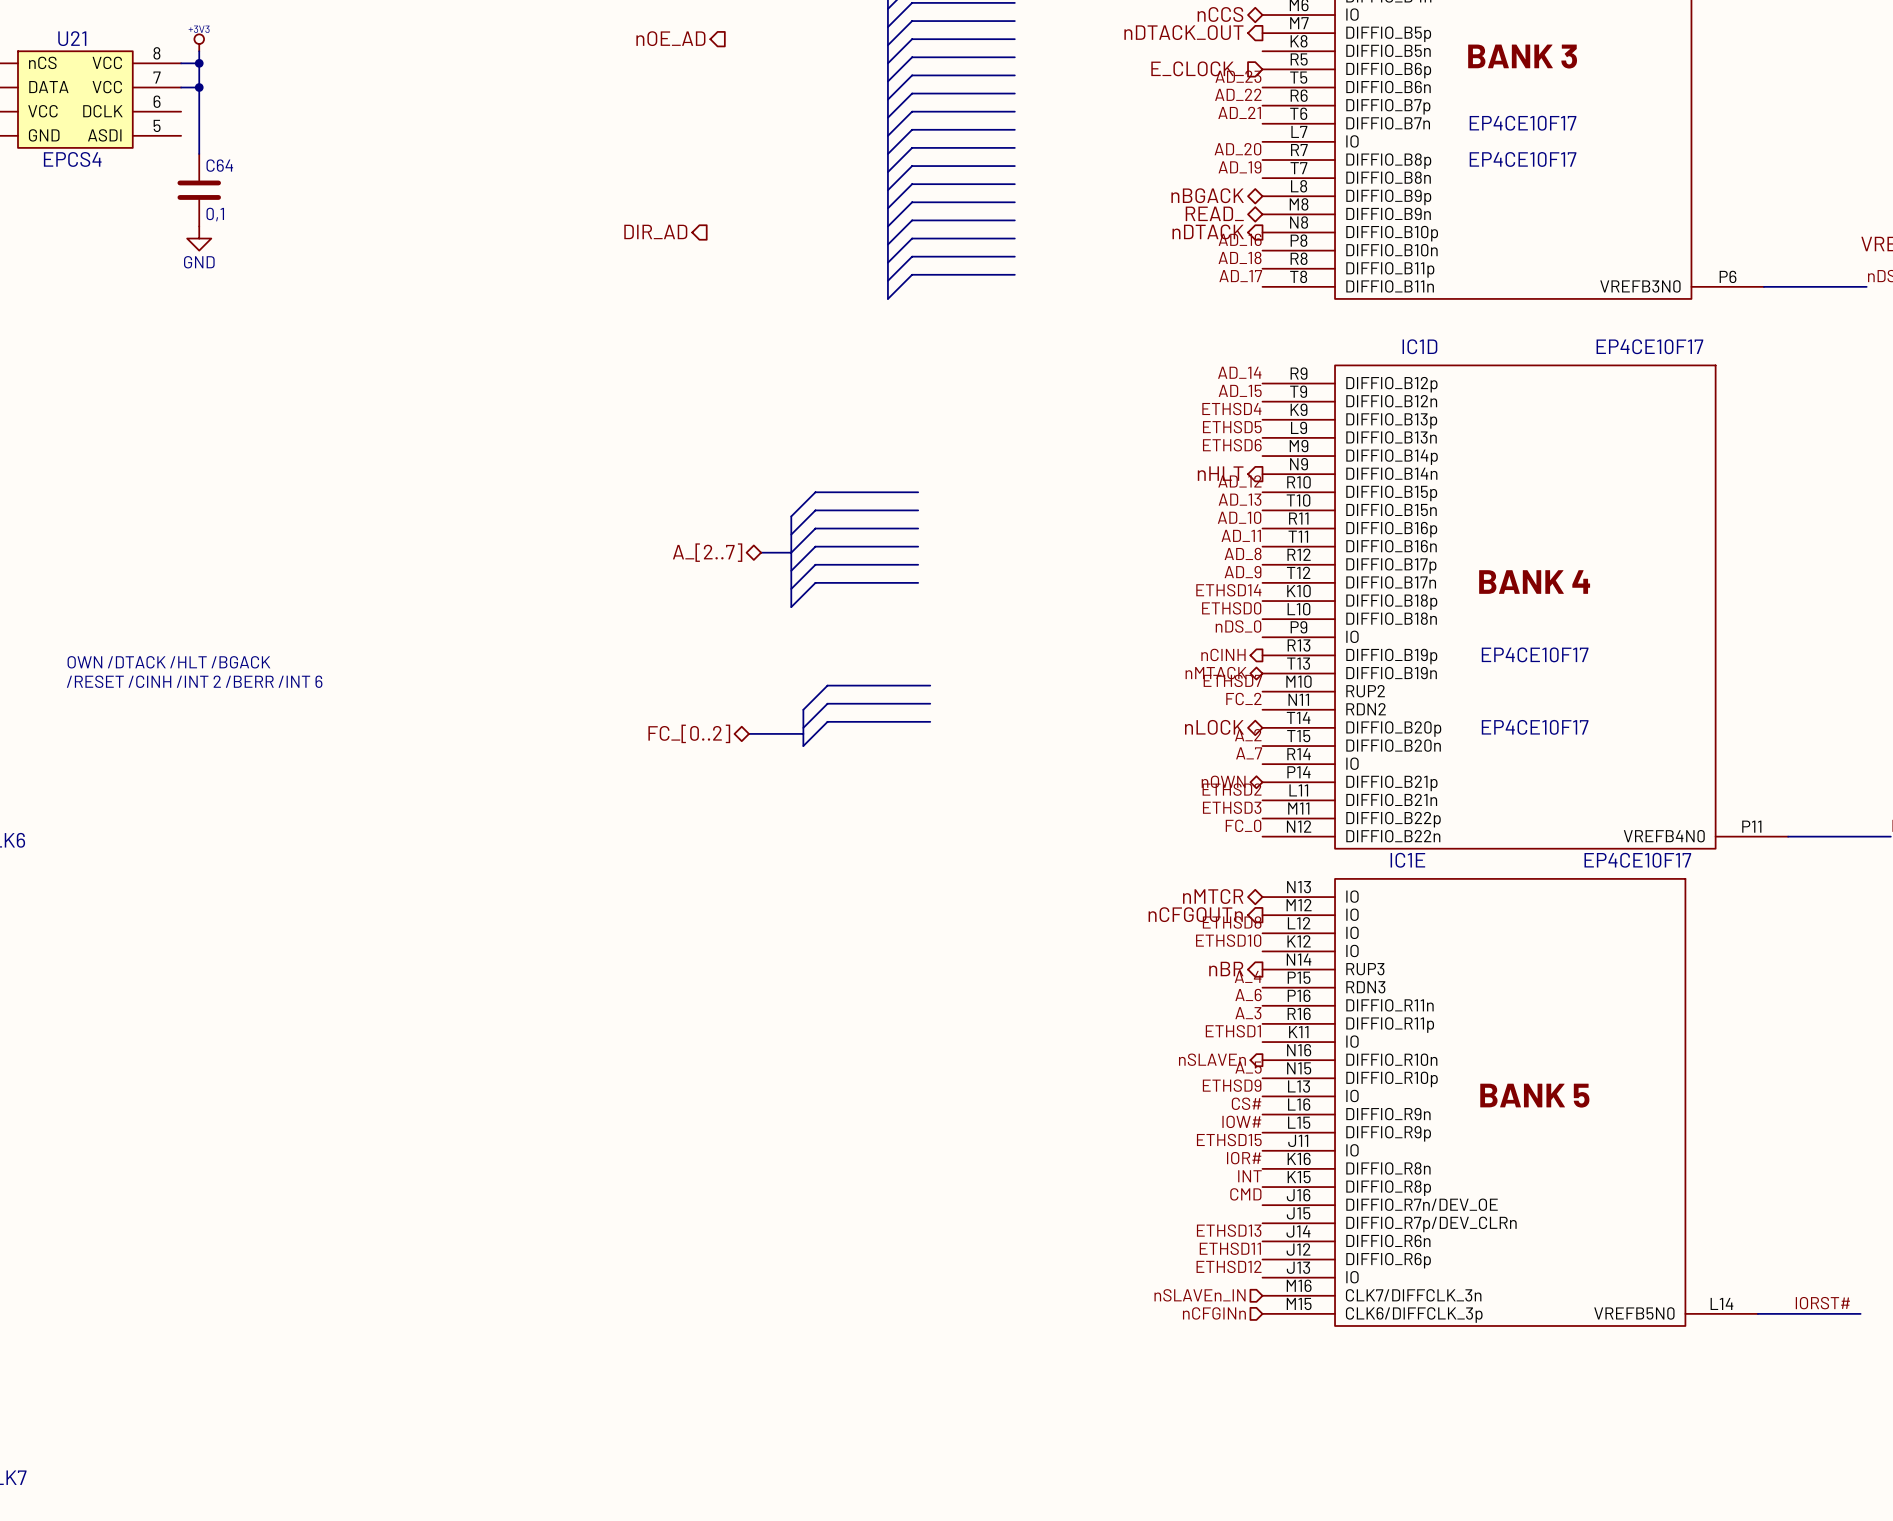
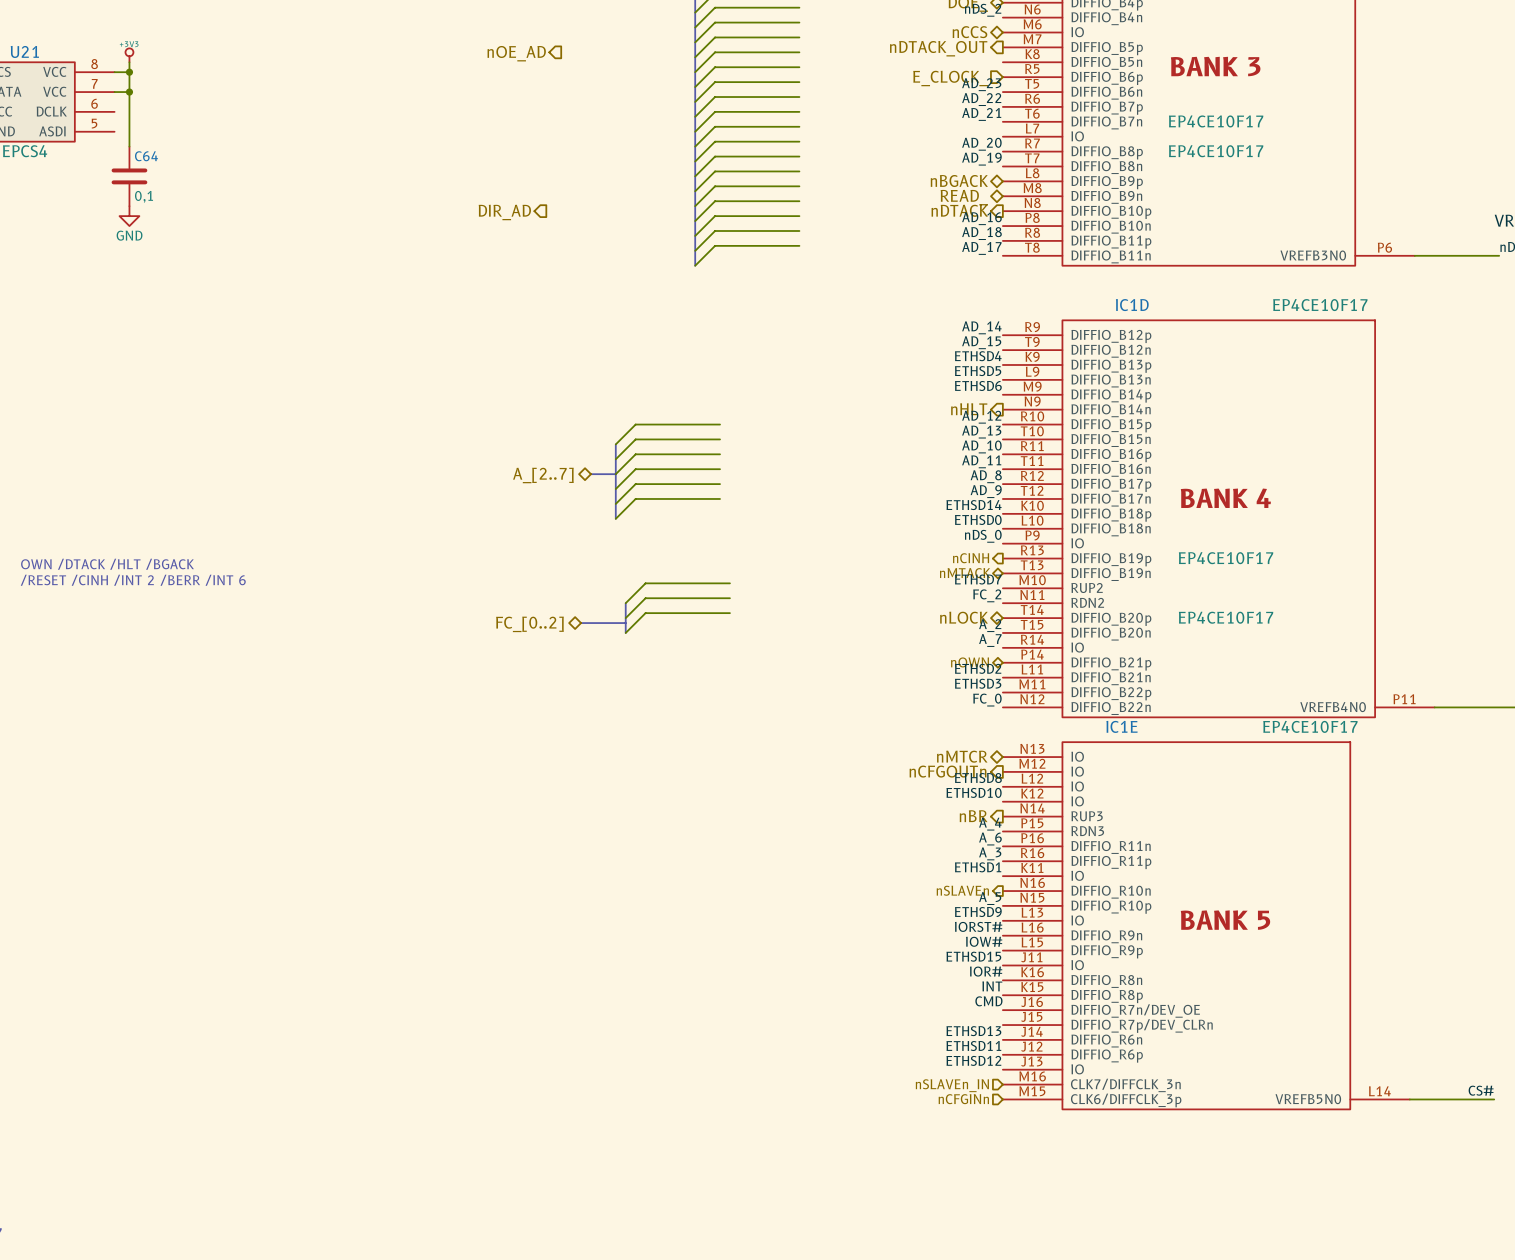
label: CS# (1246, 1103) -> IORST# (978, 926)
label: IORST# (1822, 1303) -> none
label: none -> CS# (1481, 1090)

